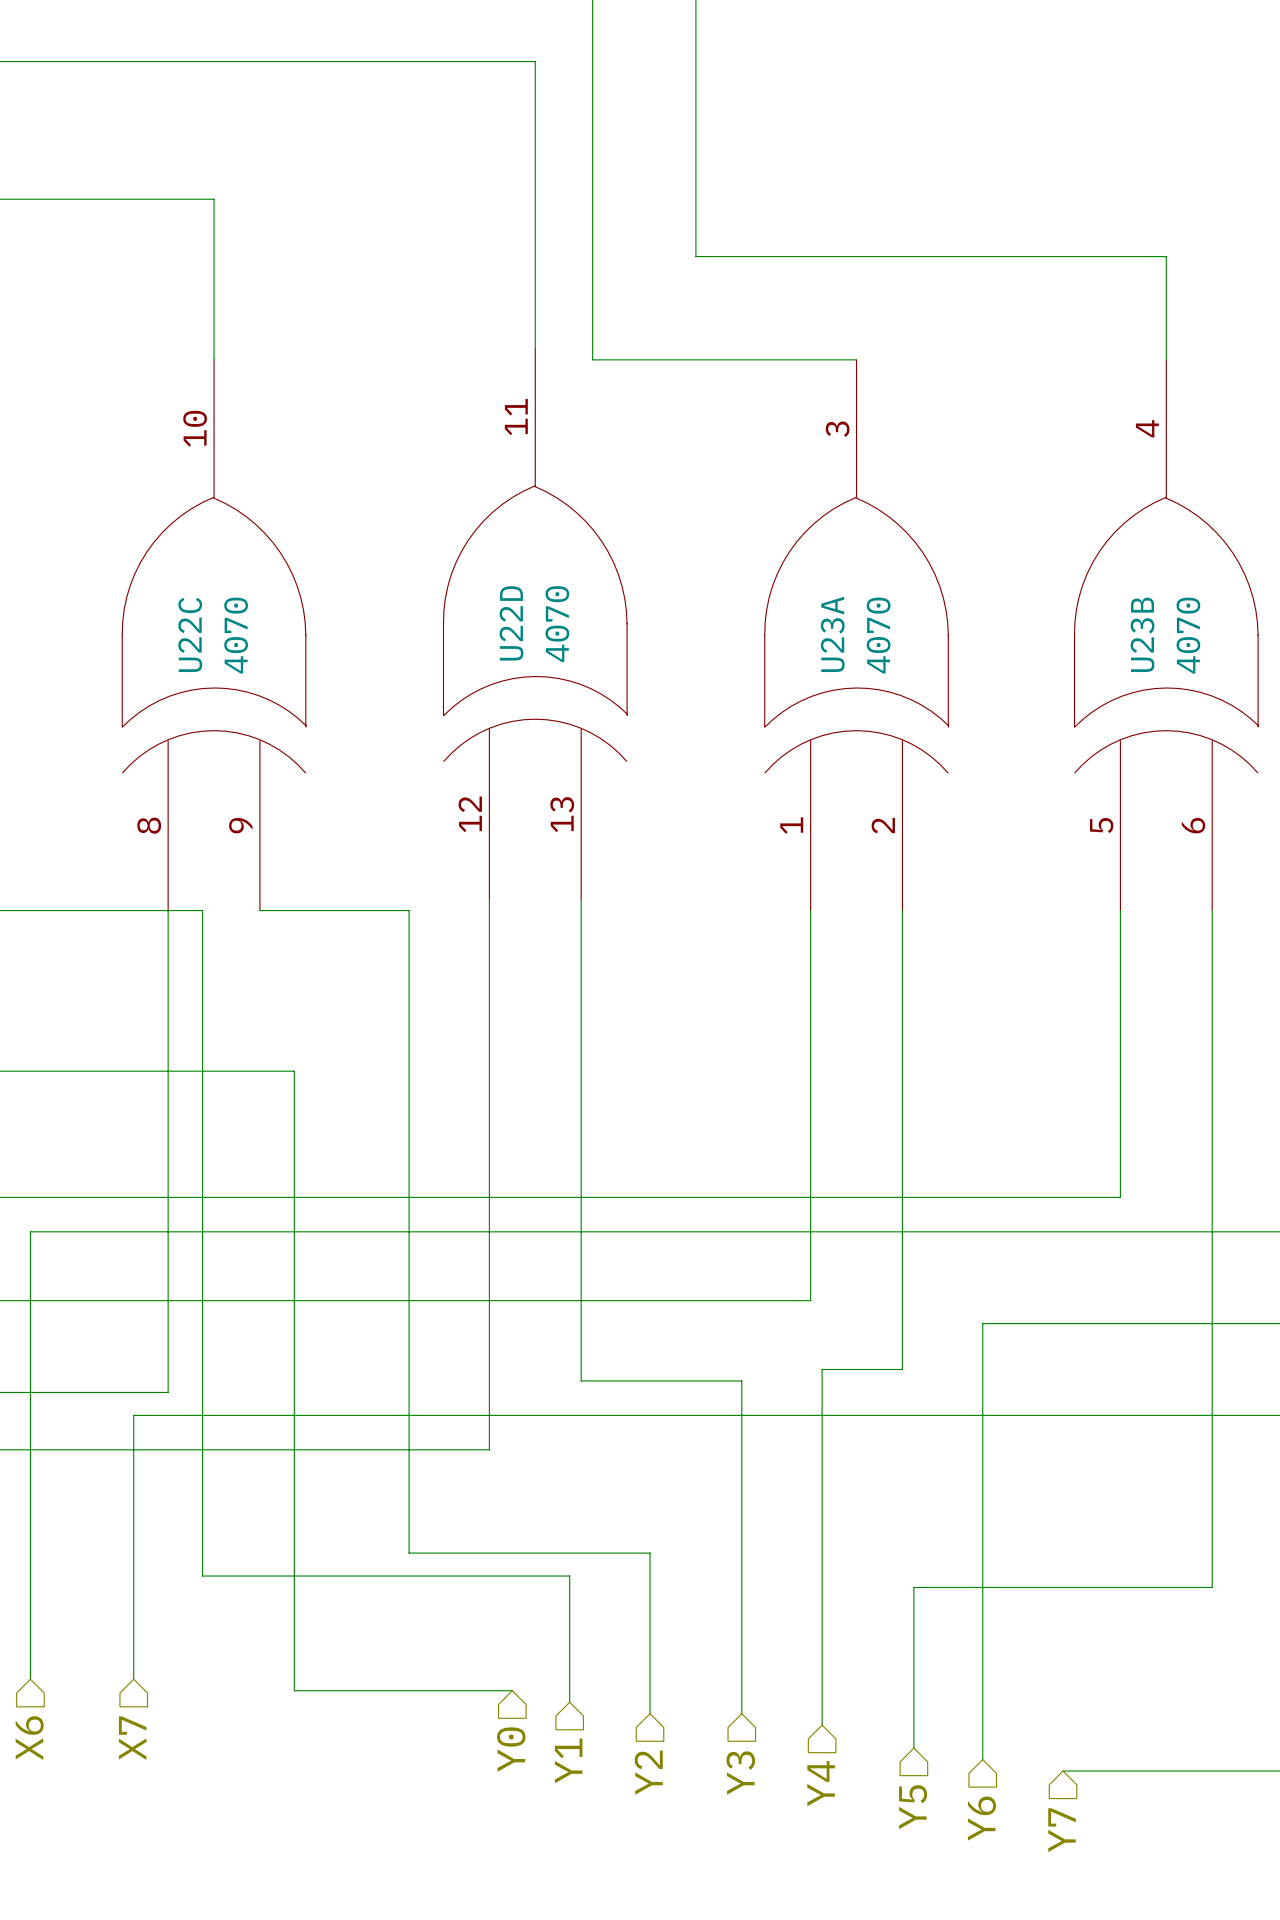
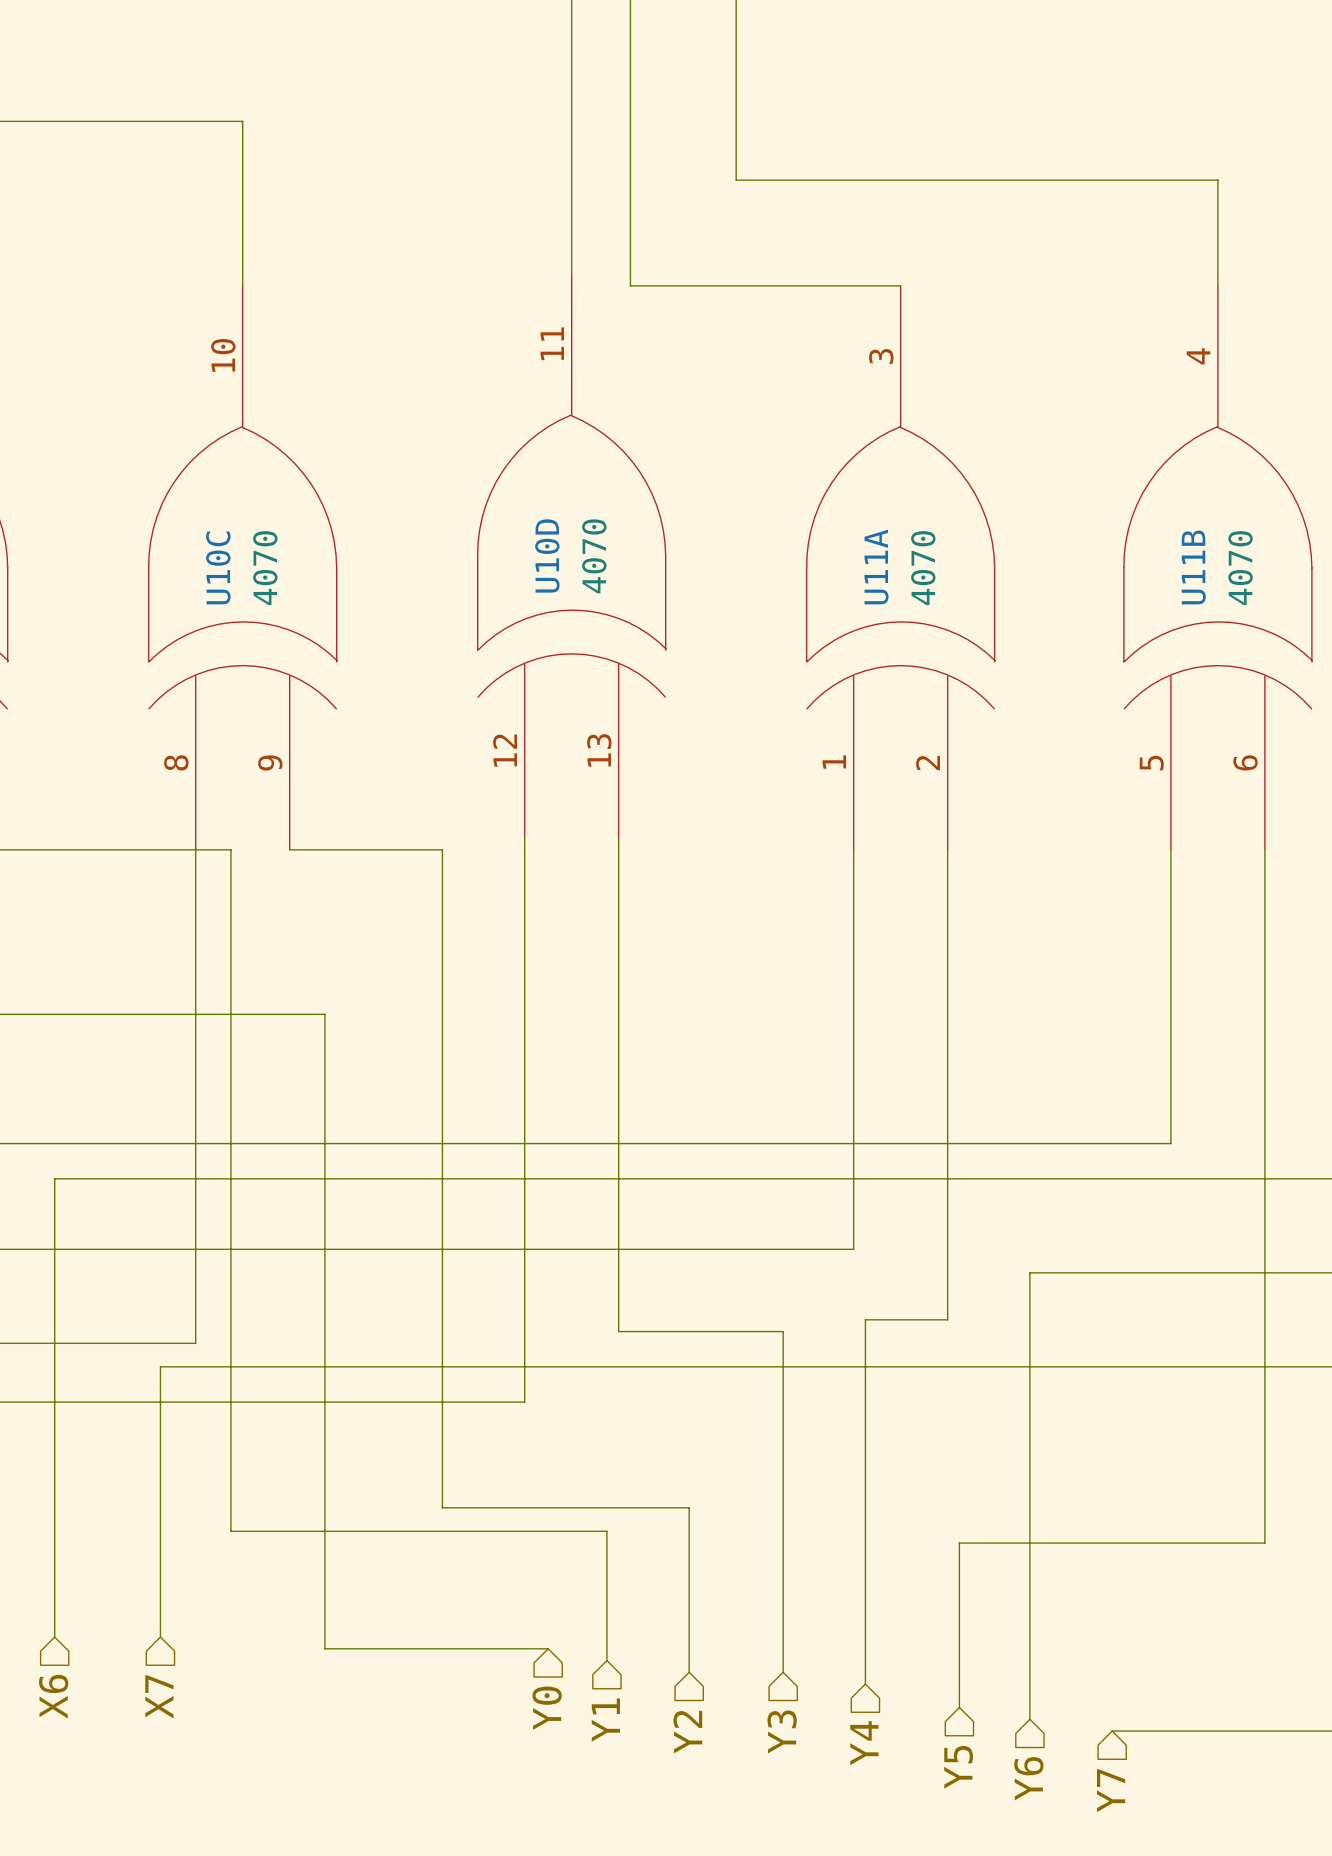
U22D name: U22D (511, 623) -> U10D (547, 555)
U22C name: U22C (190, 634) -> U10C (218, 567)
U23A name: U23A (832, 634) -> U11A (876, 566)
U23B name: U23B (1142, 634) -> U11B (1193, 567)

